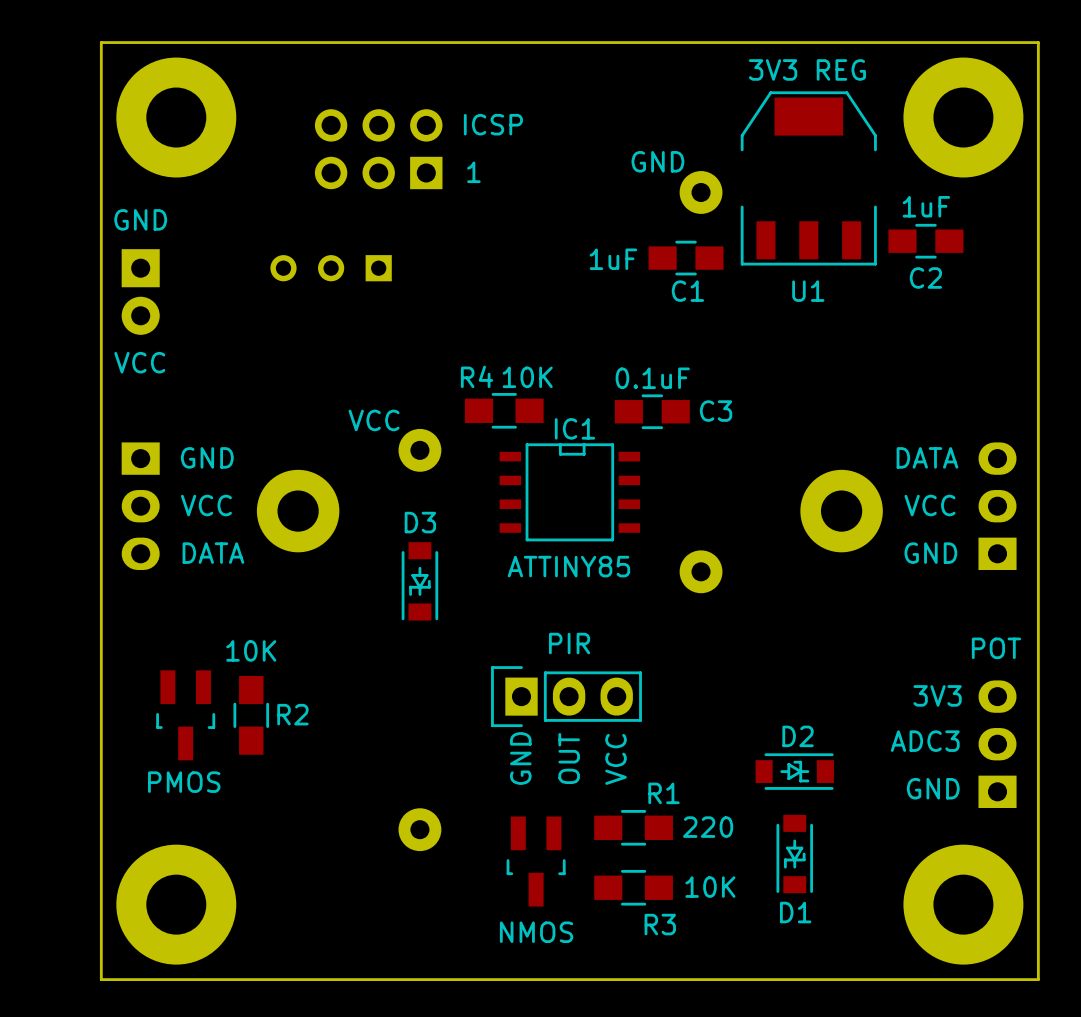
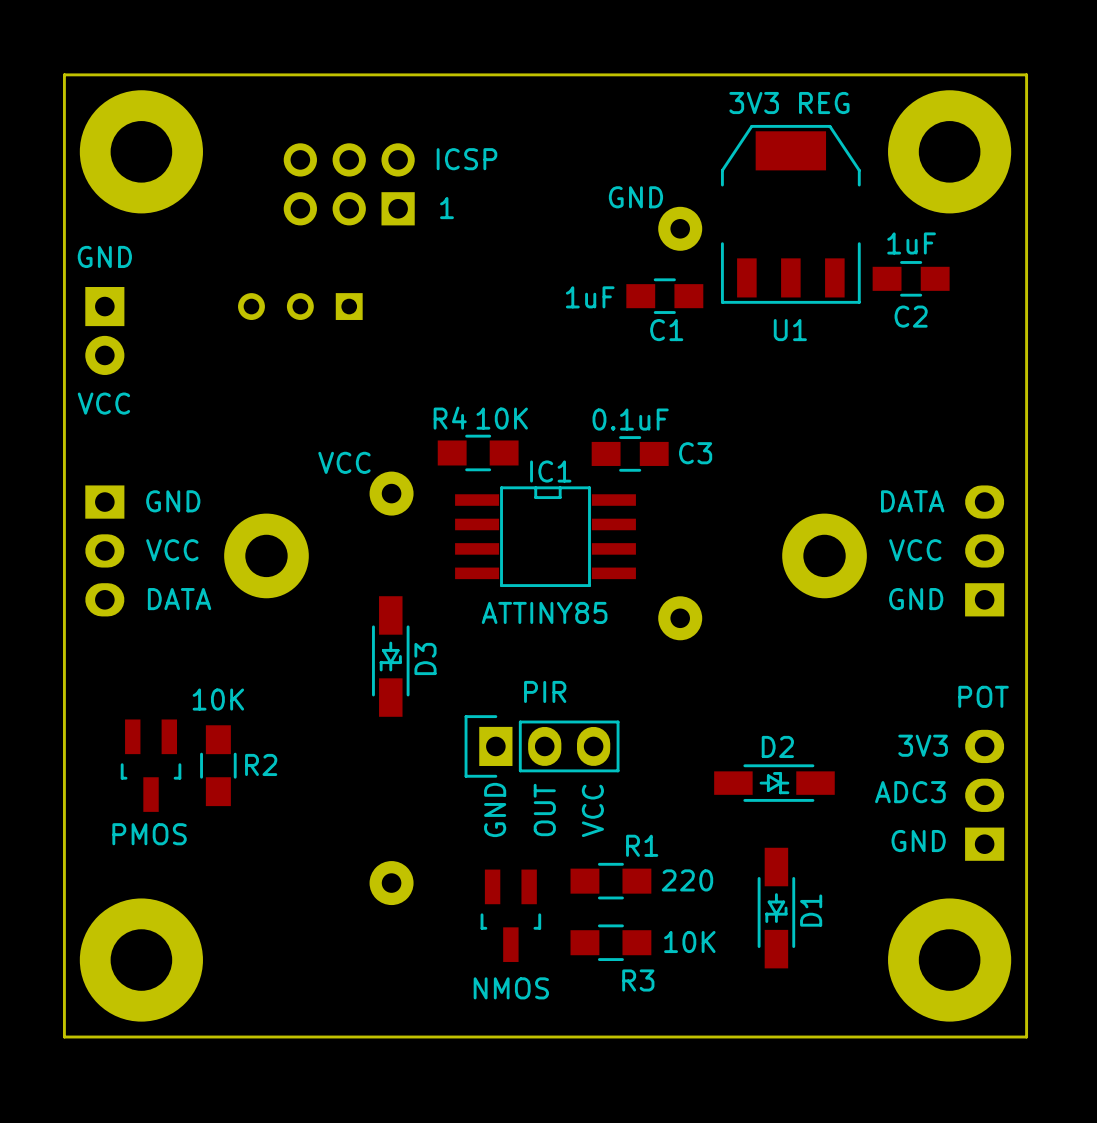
IC1 footprint: [499, 443, 641, 542] -> [455, 486, 636, 588]
D3 name position: D3 (420, 522) -> D3 (425, 658)
D3 footprint: [401, 542, 439, 621] -> [372, 596, 410, 717]
D2 footprint: [755, 753, 834, 790] -> [714, 764, 835, 802]
D1 footprint: [776, 814, 814, 894] -> [757, 847, 796, 969]
D1 name position: D1 (795, 912) -> D1 (811, 910)

